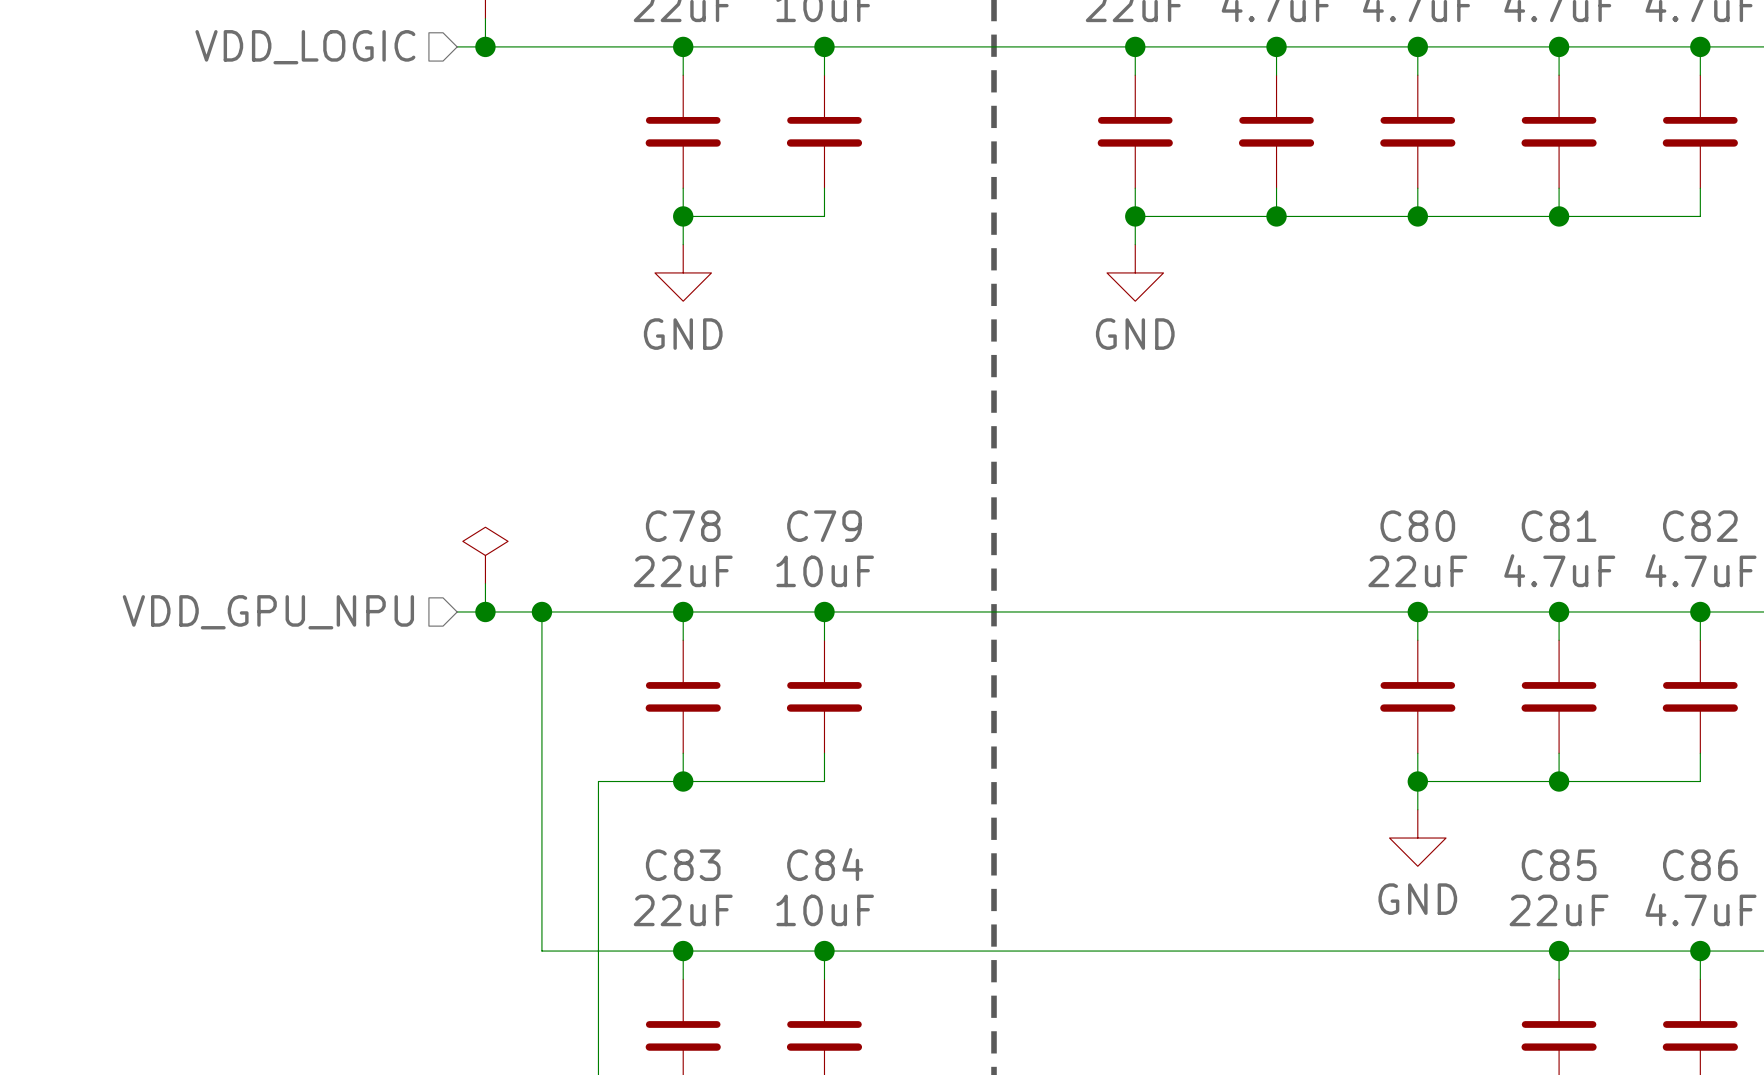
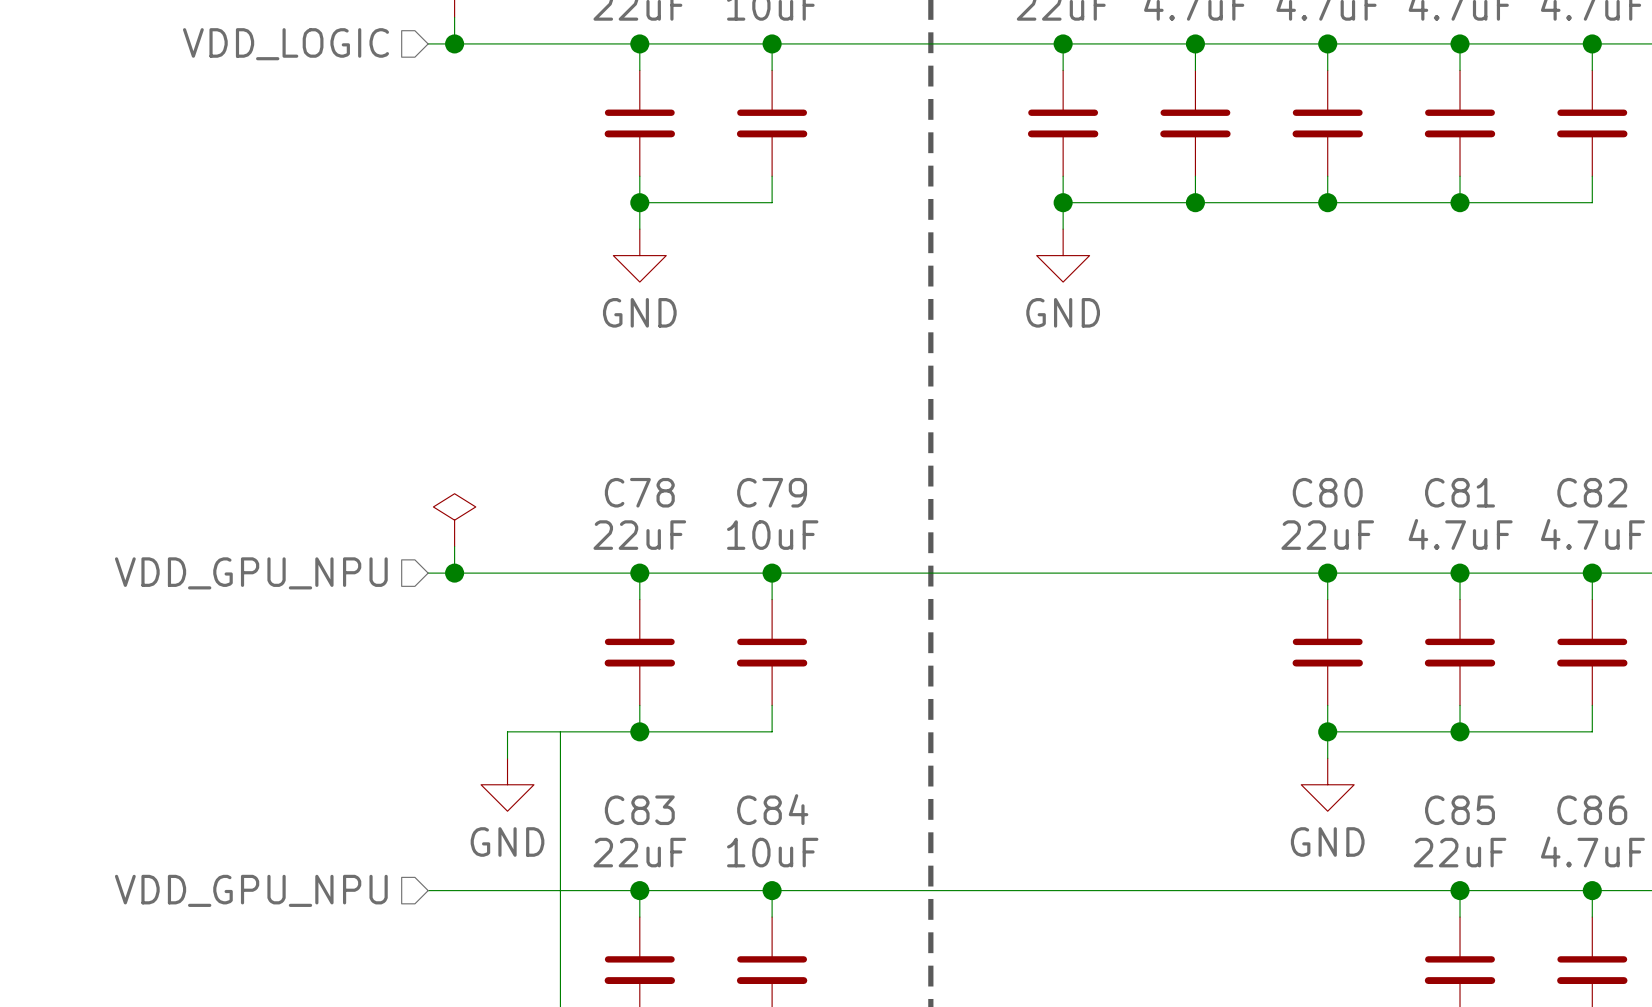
wire: (541, 611) (541, 781) -> (560, 731) (507, 731)
junction: (541, 611) -> none
wire: (541, 809) (541, 951) -> (428, 890) (507, 890)
power symbol: none -> GND (507, 784)
hierarchical label: none -> VDD_GPU_NPU (251, 890)

